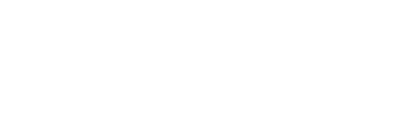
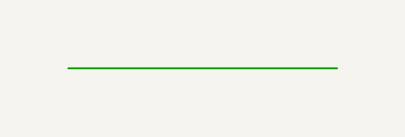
wire: none -> (68, 68) (337, 68)

